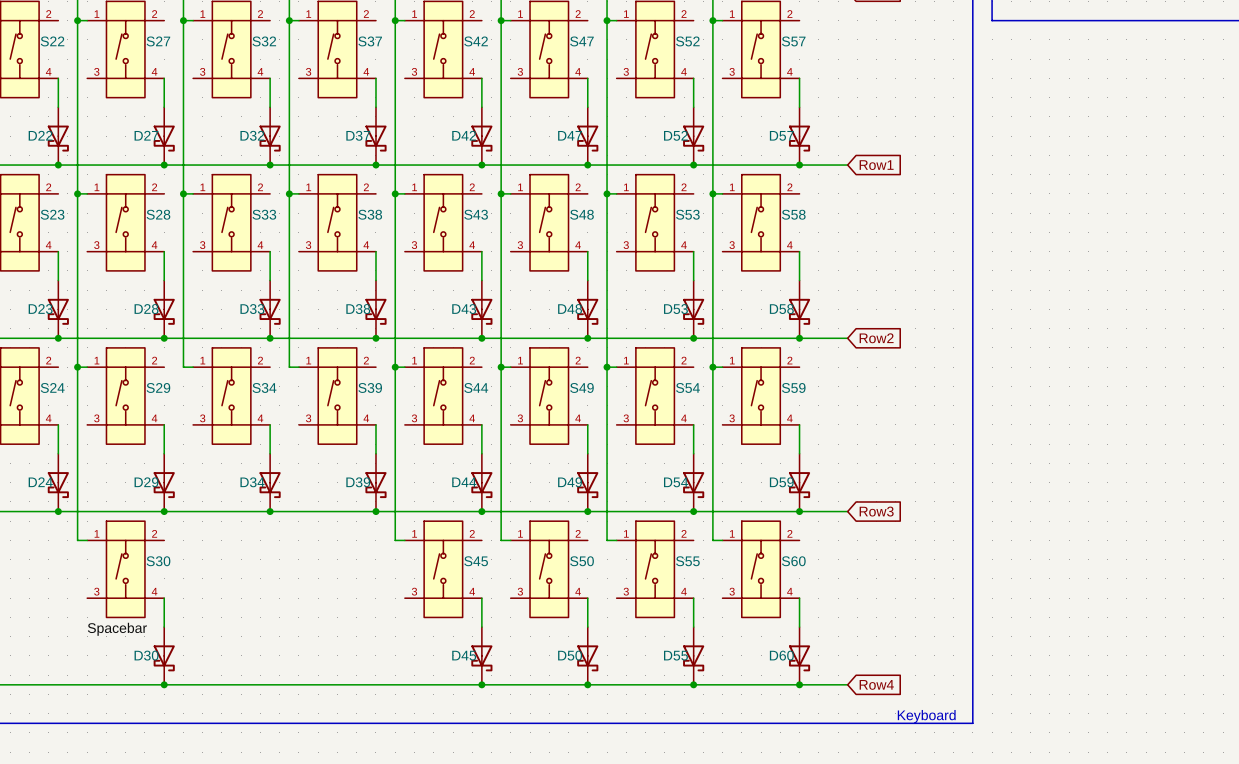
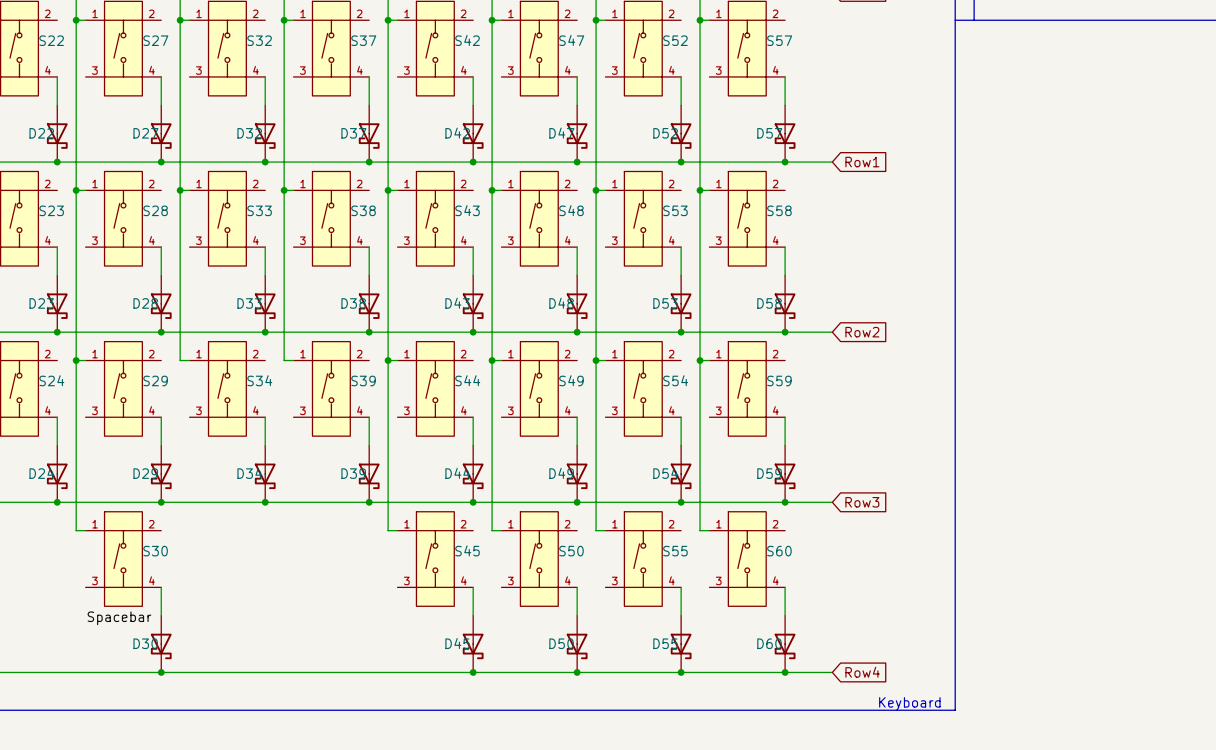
line: none -> (955, 20) (974, 20)

